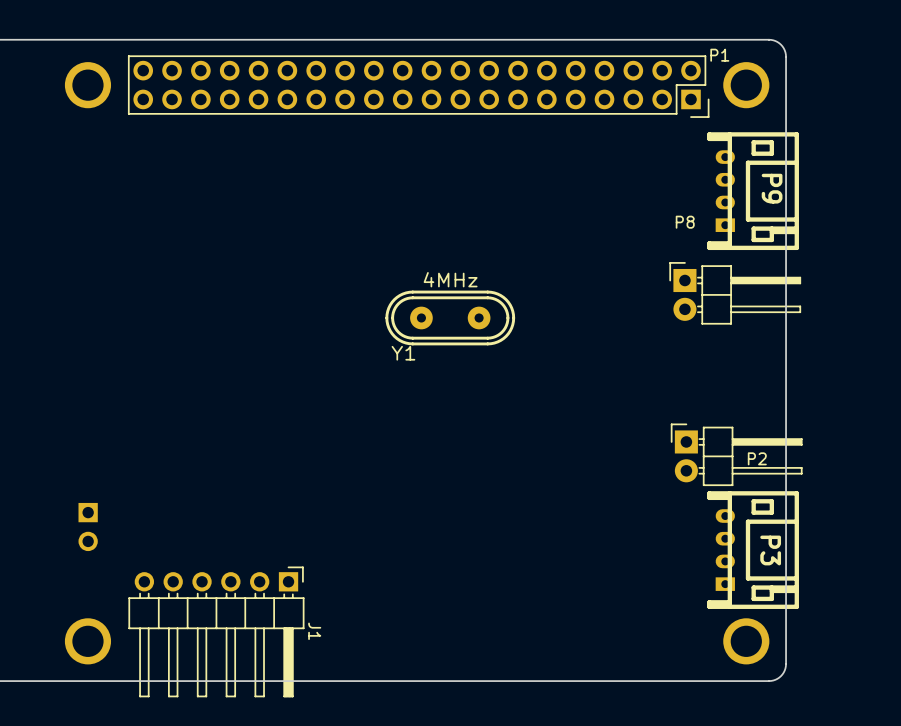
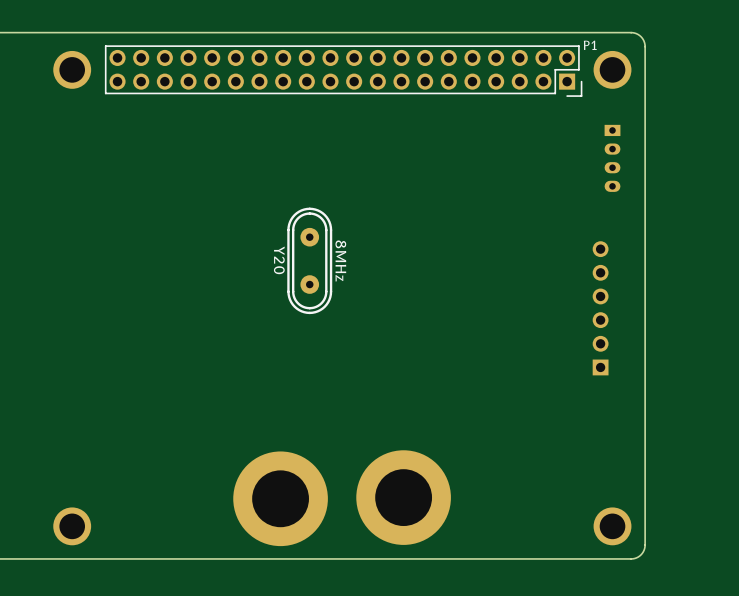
P9 side: bottom (753, 191) -> top (612, 158)
P8: (735, 293) -> none
Y20: none -> 8MHz (309, 260)
Y1: 4MHz (450, 317) -> none
part: none -> (600, 308)
P2: (736, 454) -> none
part: (88, 527) -> none
P3: (753, 550) -> none
part: none -> (403, 497)
part: none -> (280, 498)
J1: (216, 631) -> none

